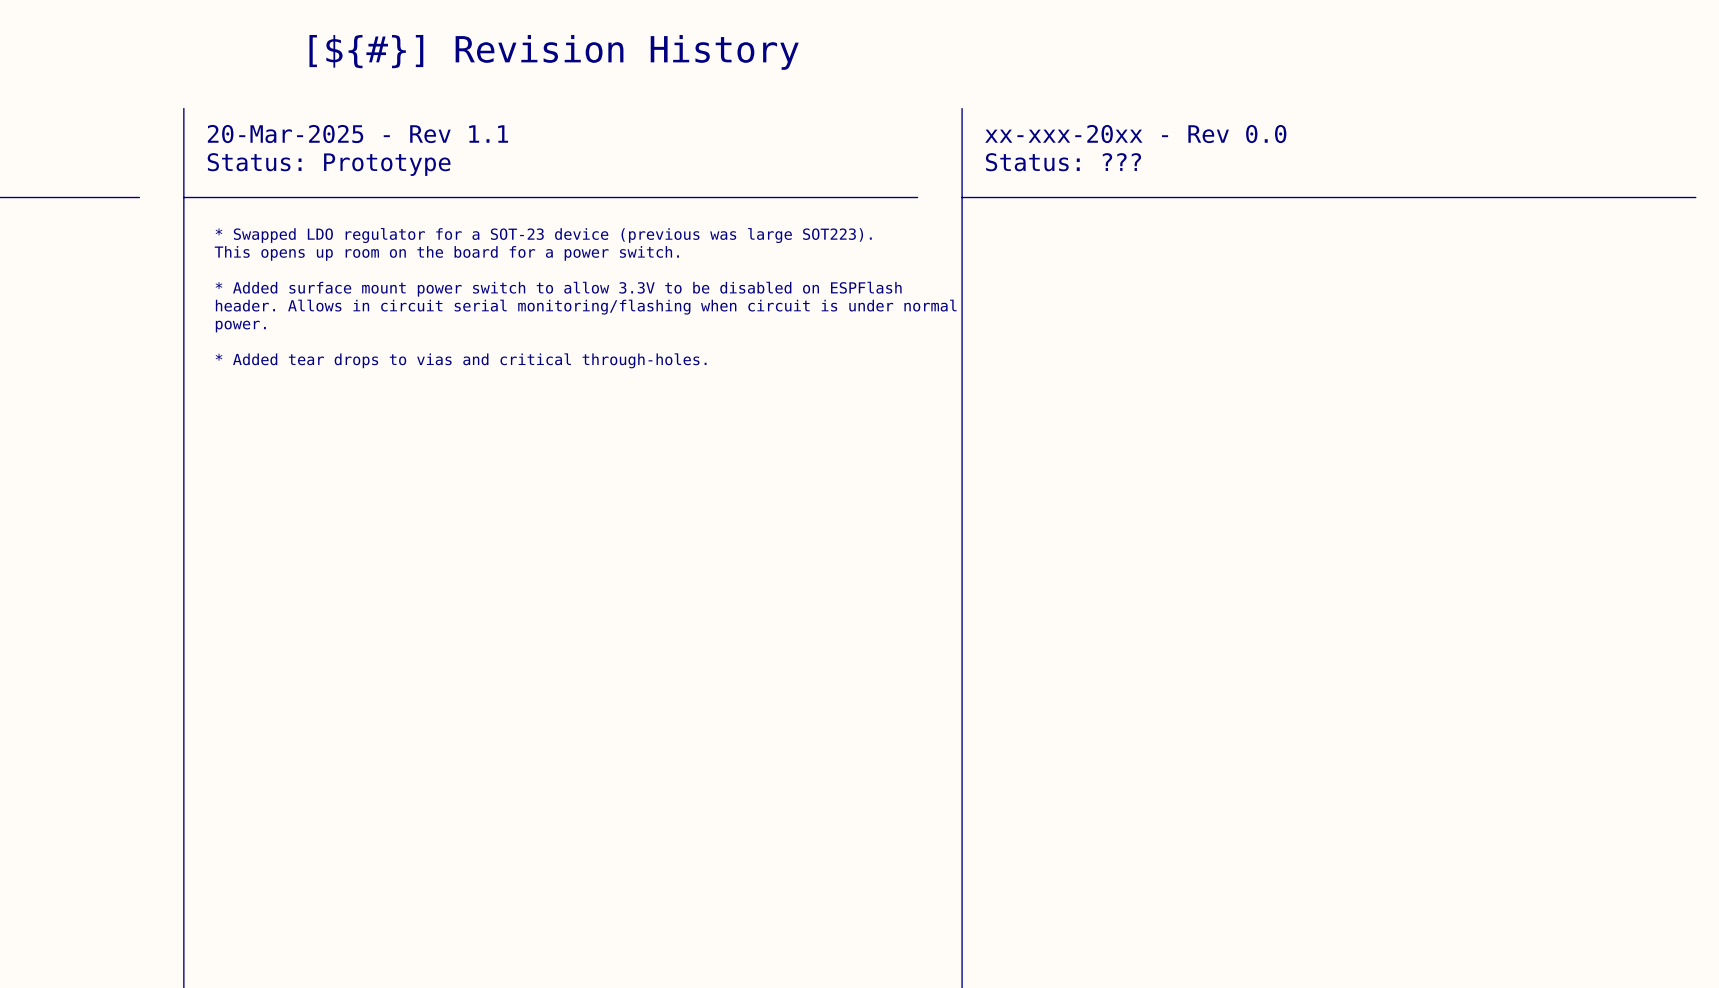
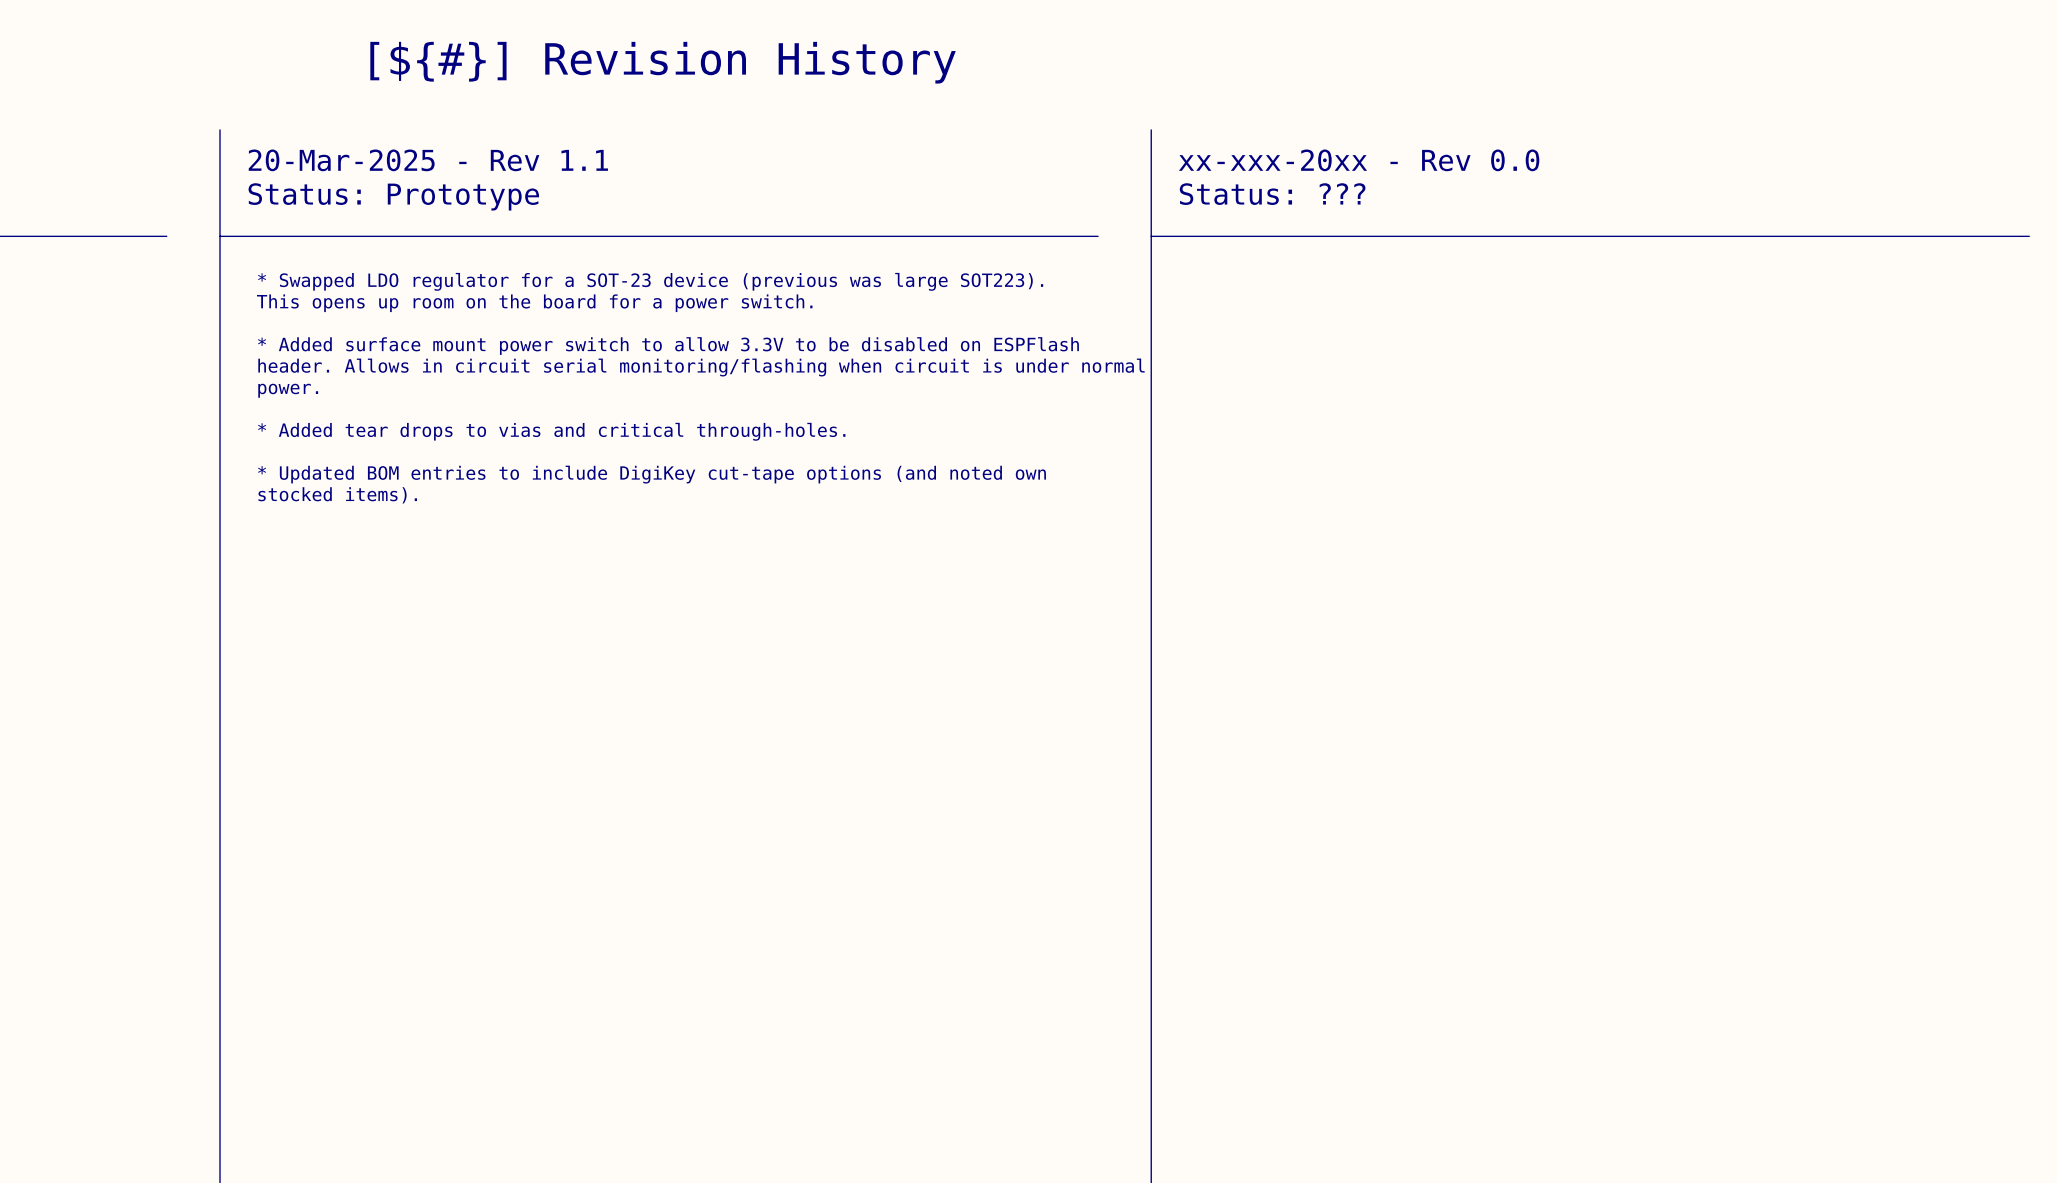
text: none -> * Updated BOM entries to include DigiKey cut-tape options (and noted own (652, 474)
text: none -> stocked items). (337, 495)

